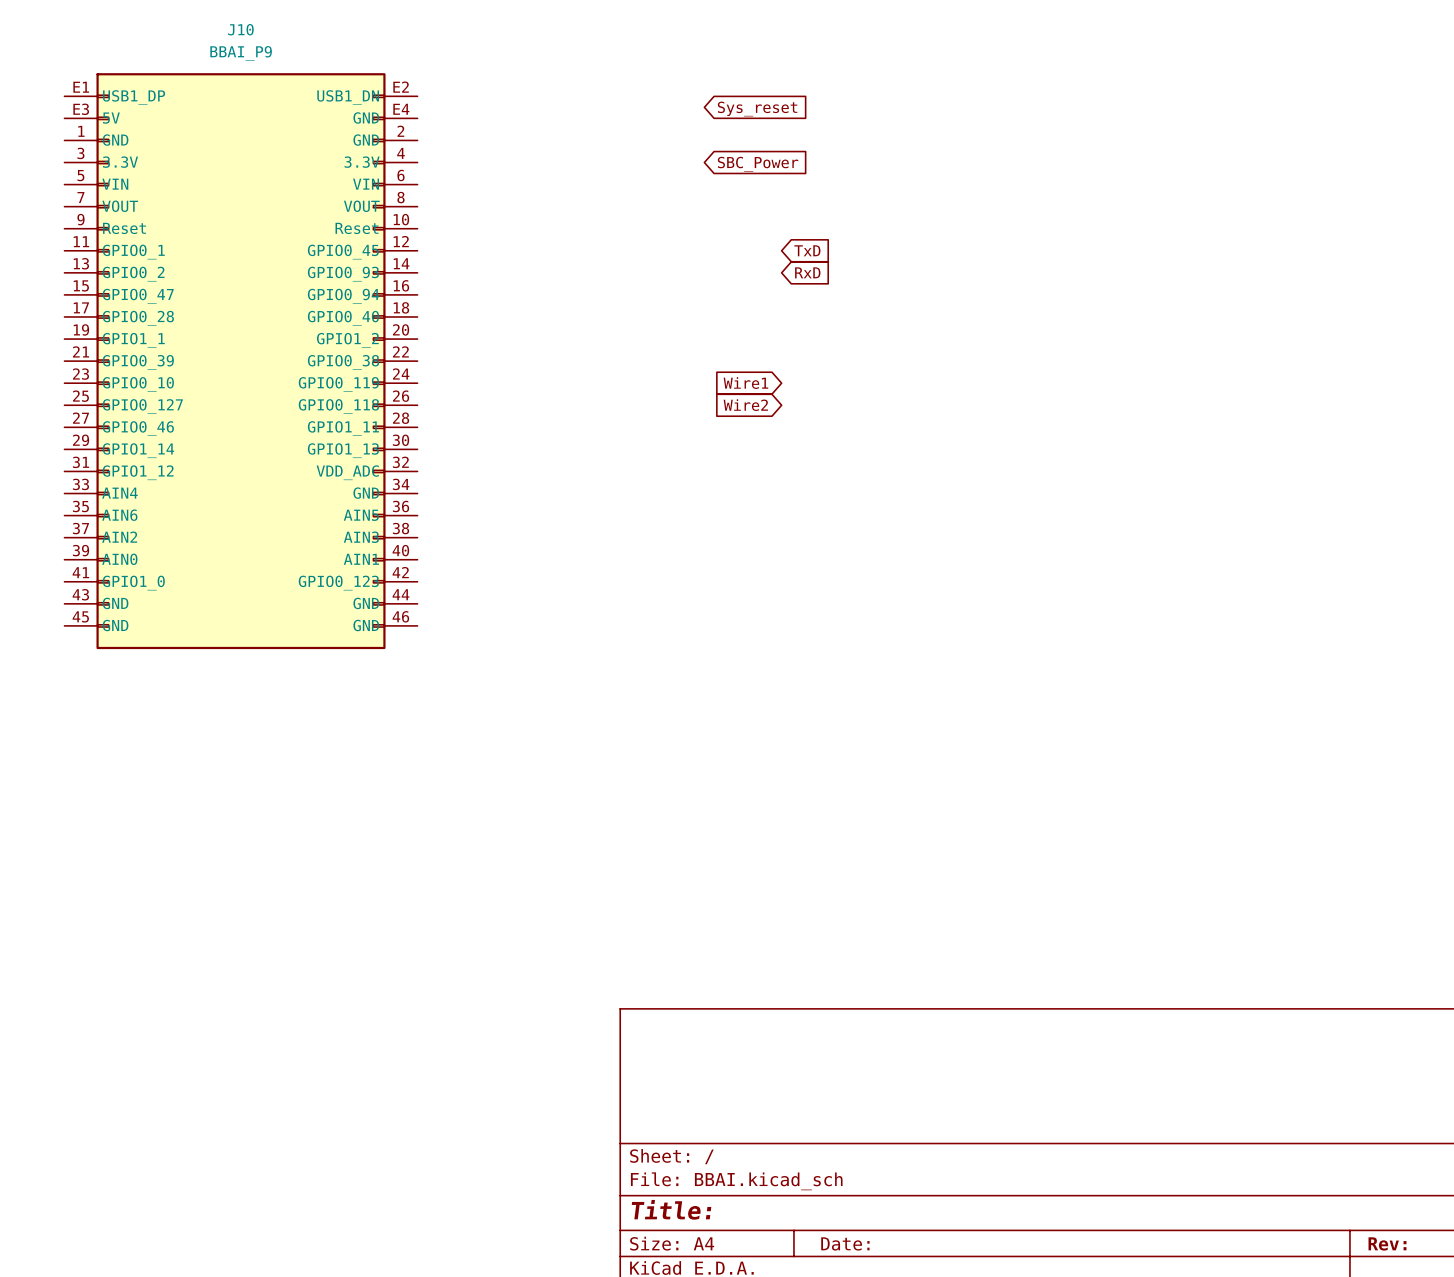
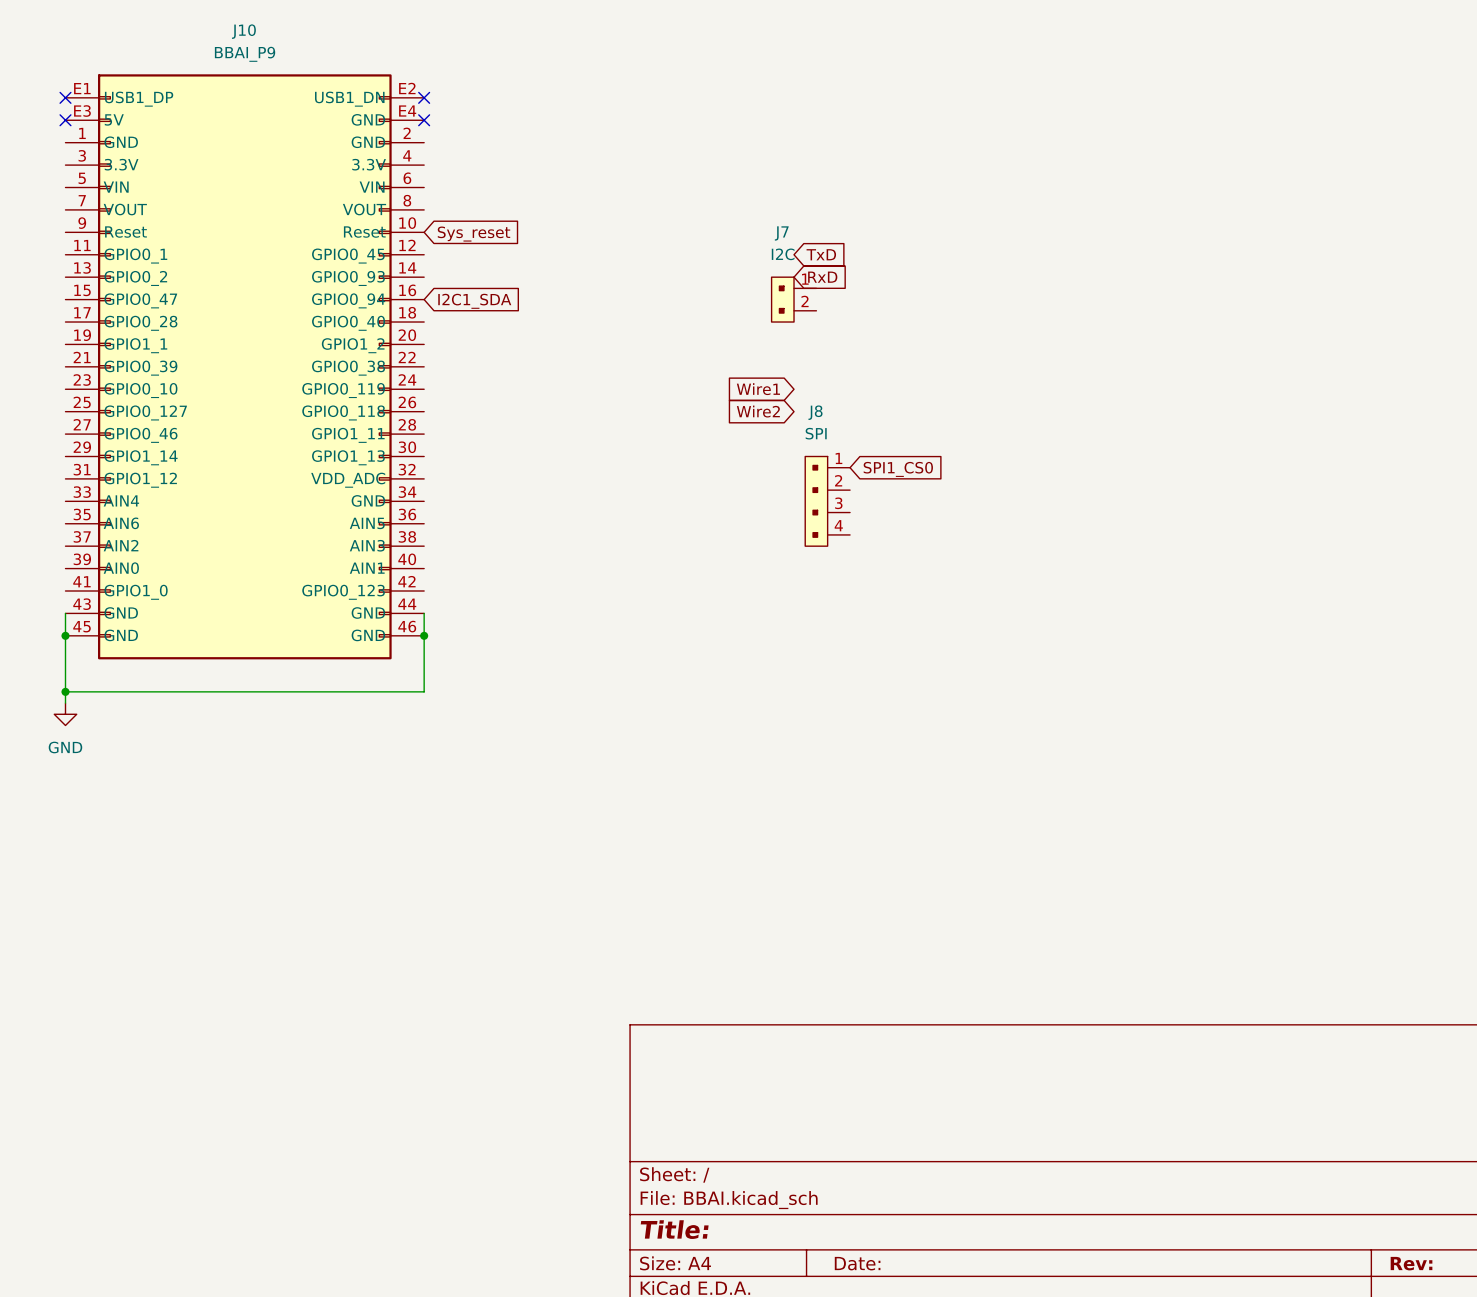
no-connect mark: none -> (65, 97)
no-connect mark: none -> (424, 97)
global label: Sys_reset (757, 109) -> none
no-connect mark: none -> (65, 120)
no-connect mark: none -> (424, 120)
global label: SBC_Power (758, 164) -> none
global label: none -> Sys_reset (473, 234)
J7: none -> I2C (794, 299)
global label: none -> I2C1_SDA (474, 301)
global label: none -> SPI1_CS0 (898, 469)
J8: none -> SPI (827, 501)
wire: none -> (65, 613) (65, 703)
wire: none -> (424, 613) (424, 691) (65, 691)
junction: none -> (65, 635)
junction: none -> (424, 635)
junction: none -> (65, 691)
power symbol: none -> GND (65, 714)

